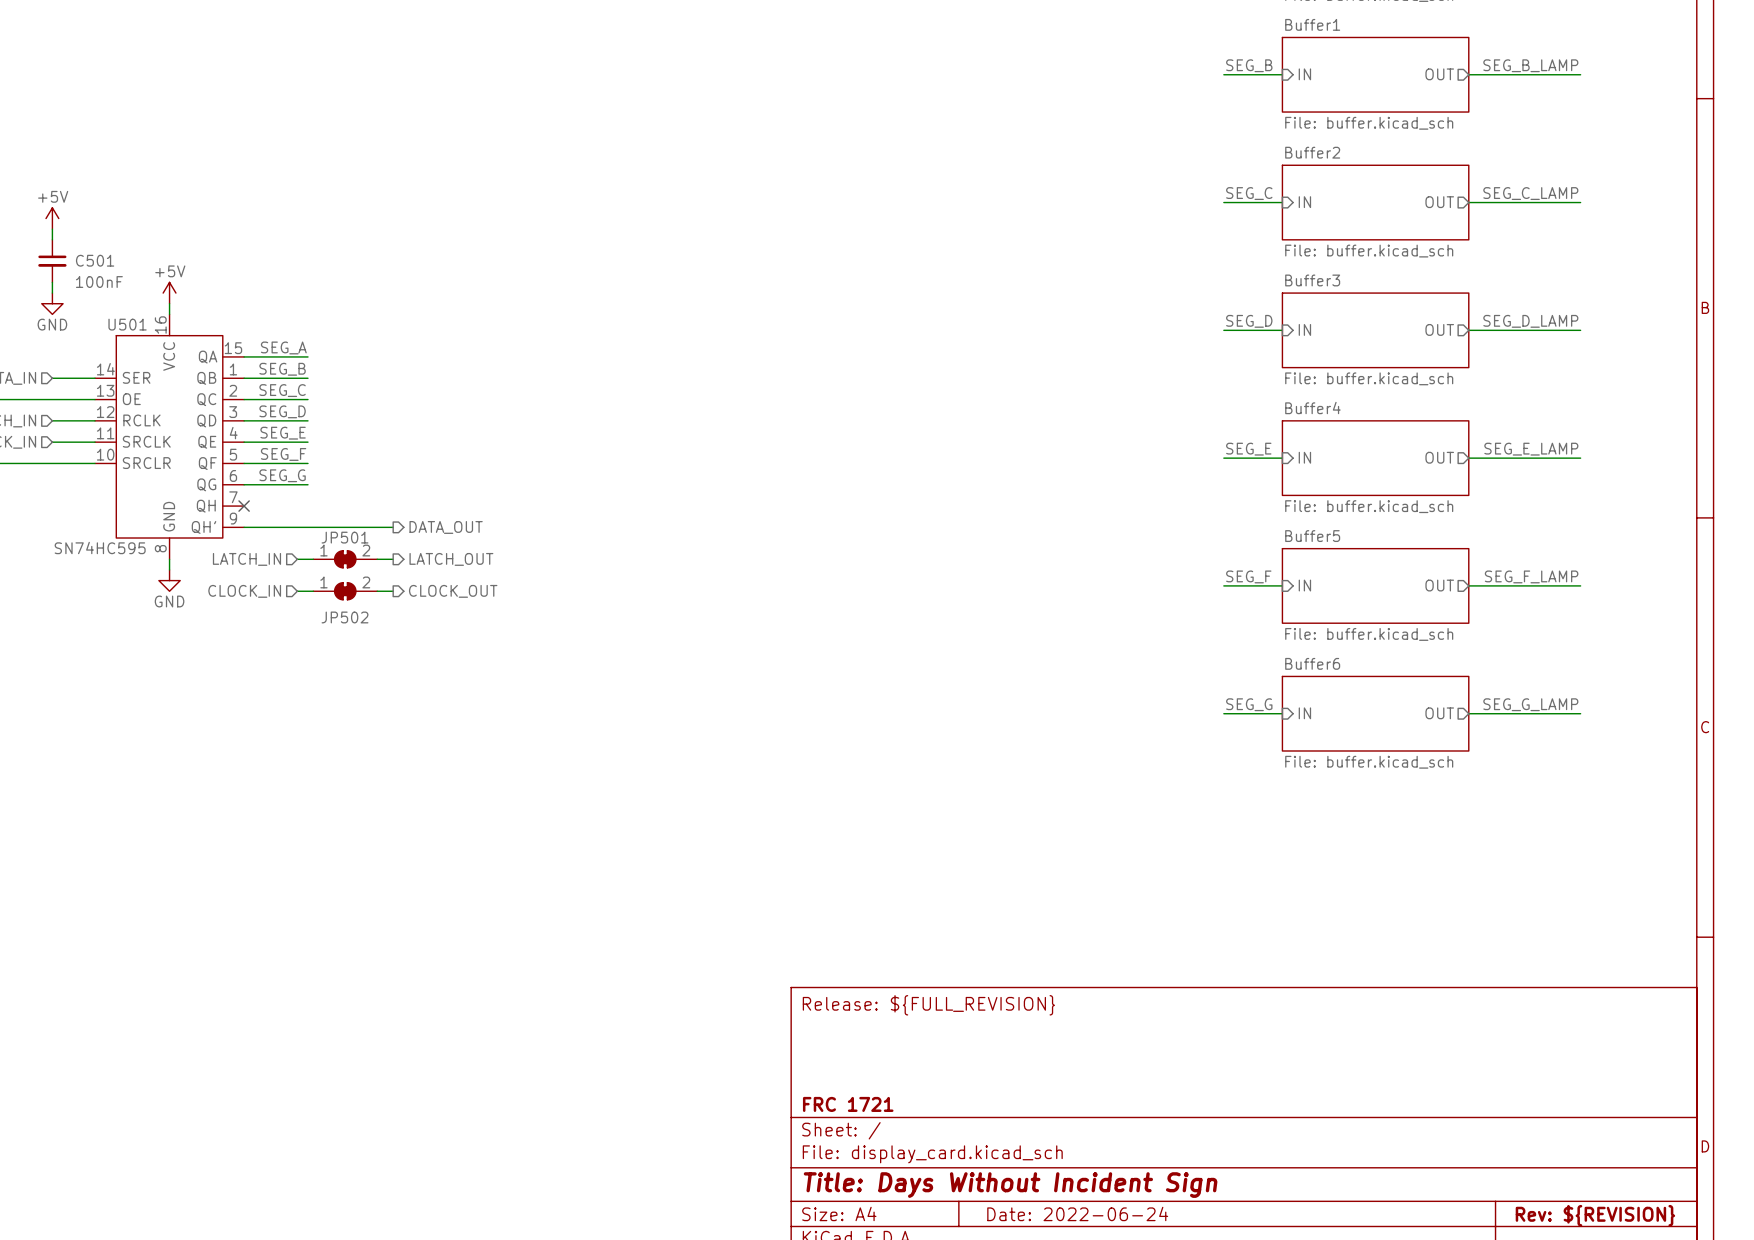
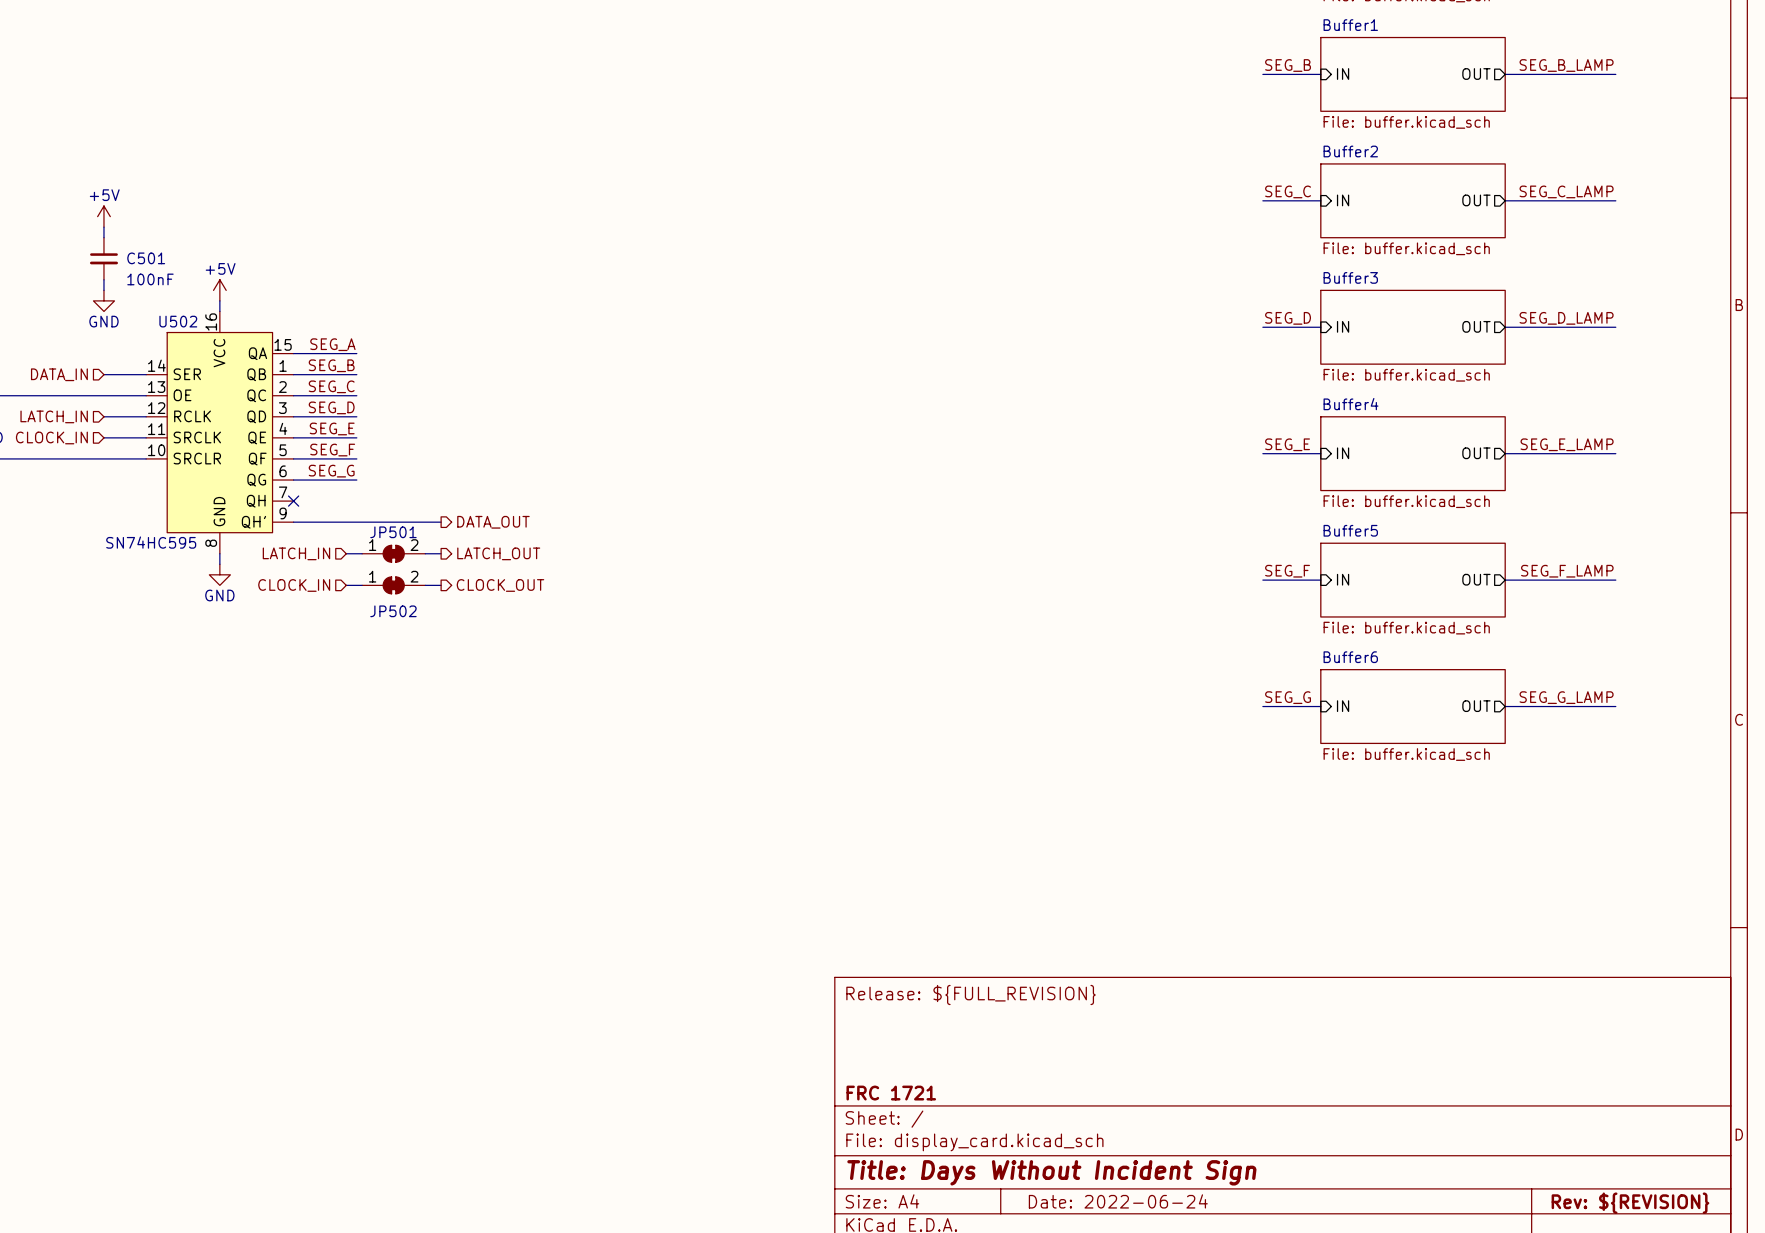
U501 name: U501 (127, 324) -> U502 (178, 321)

